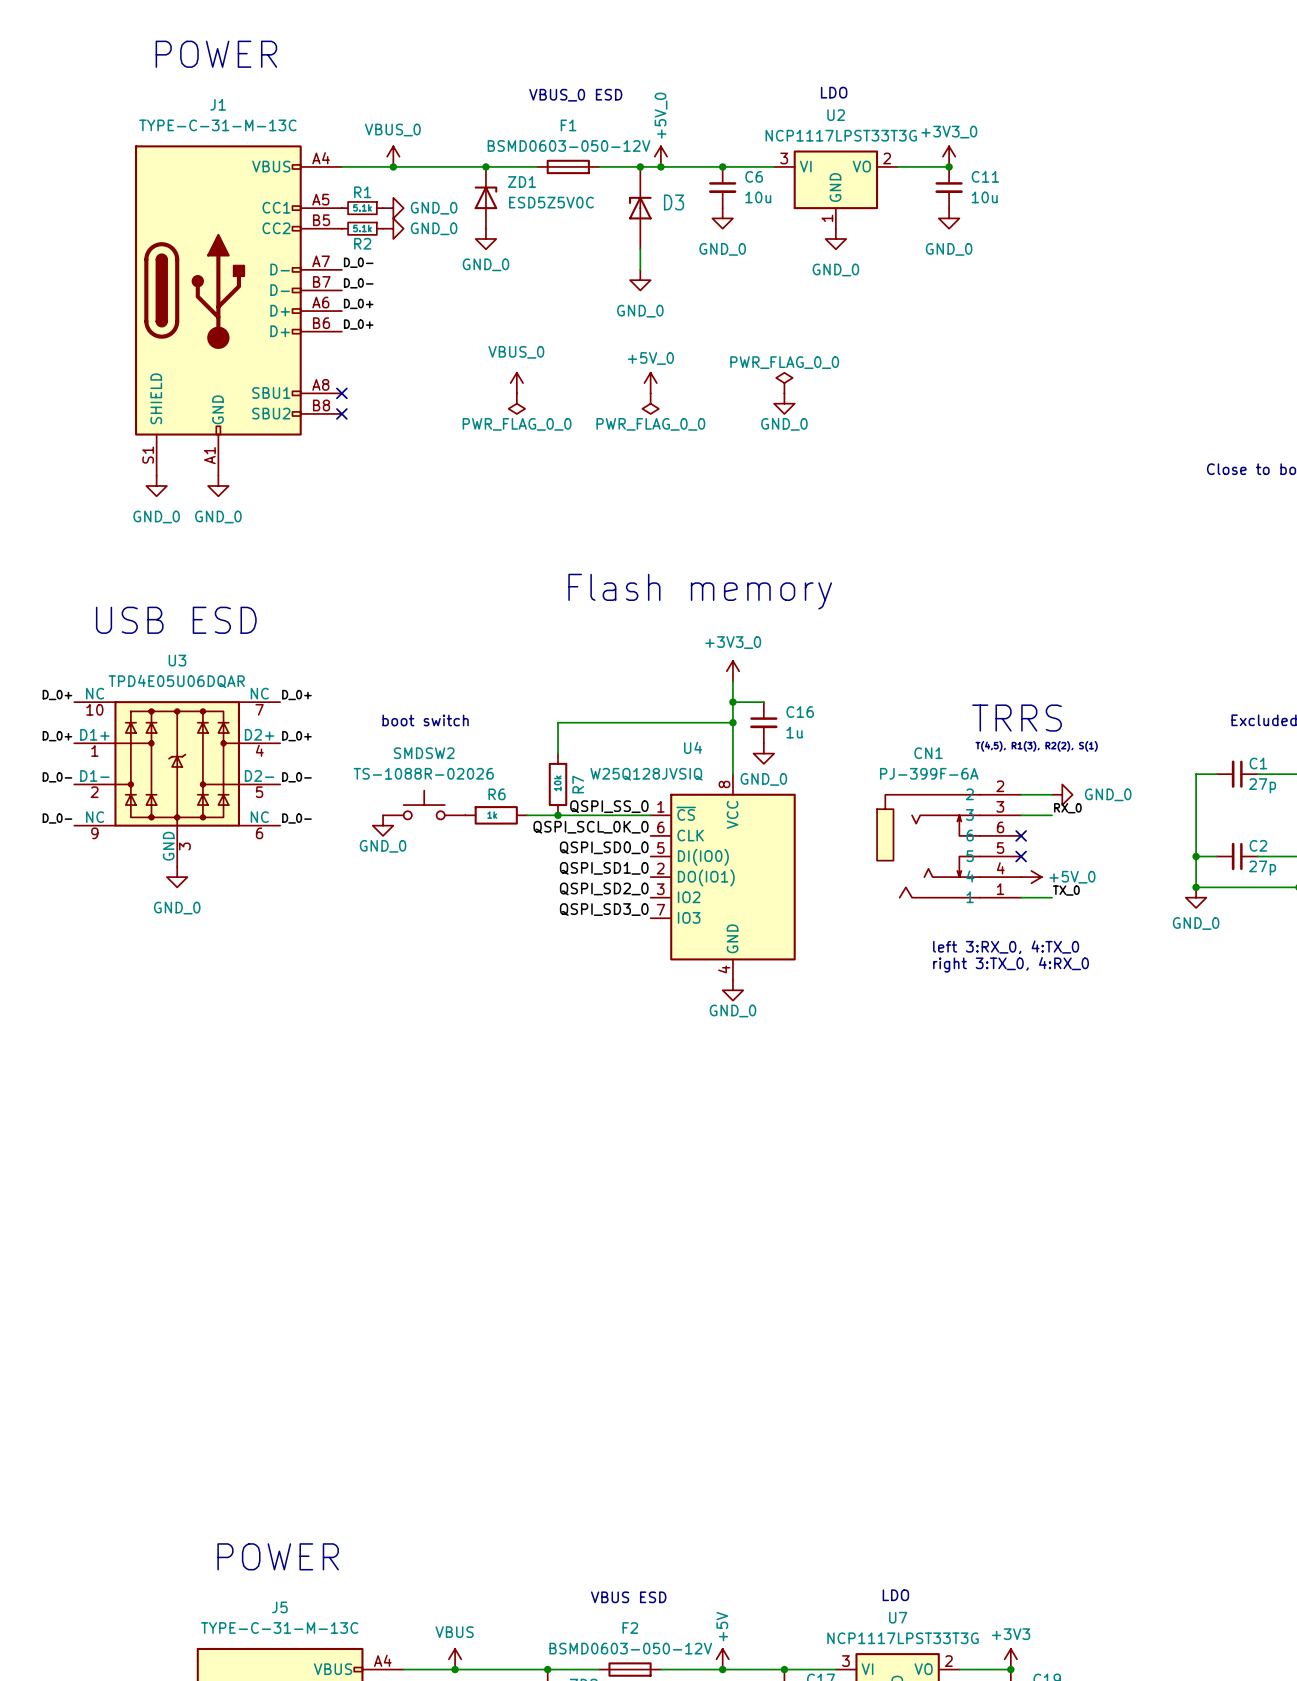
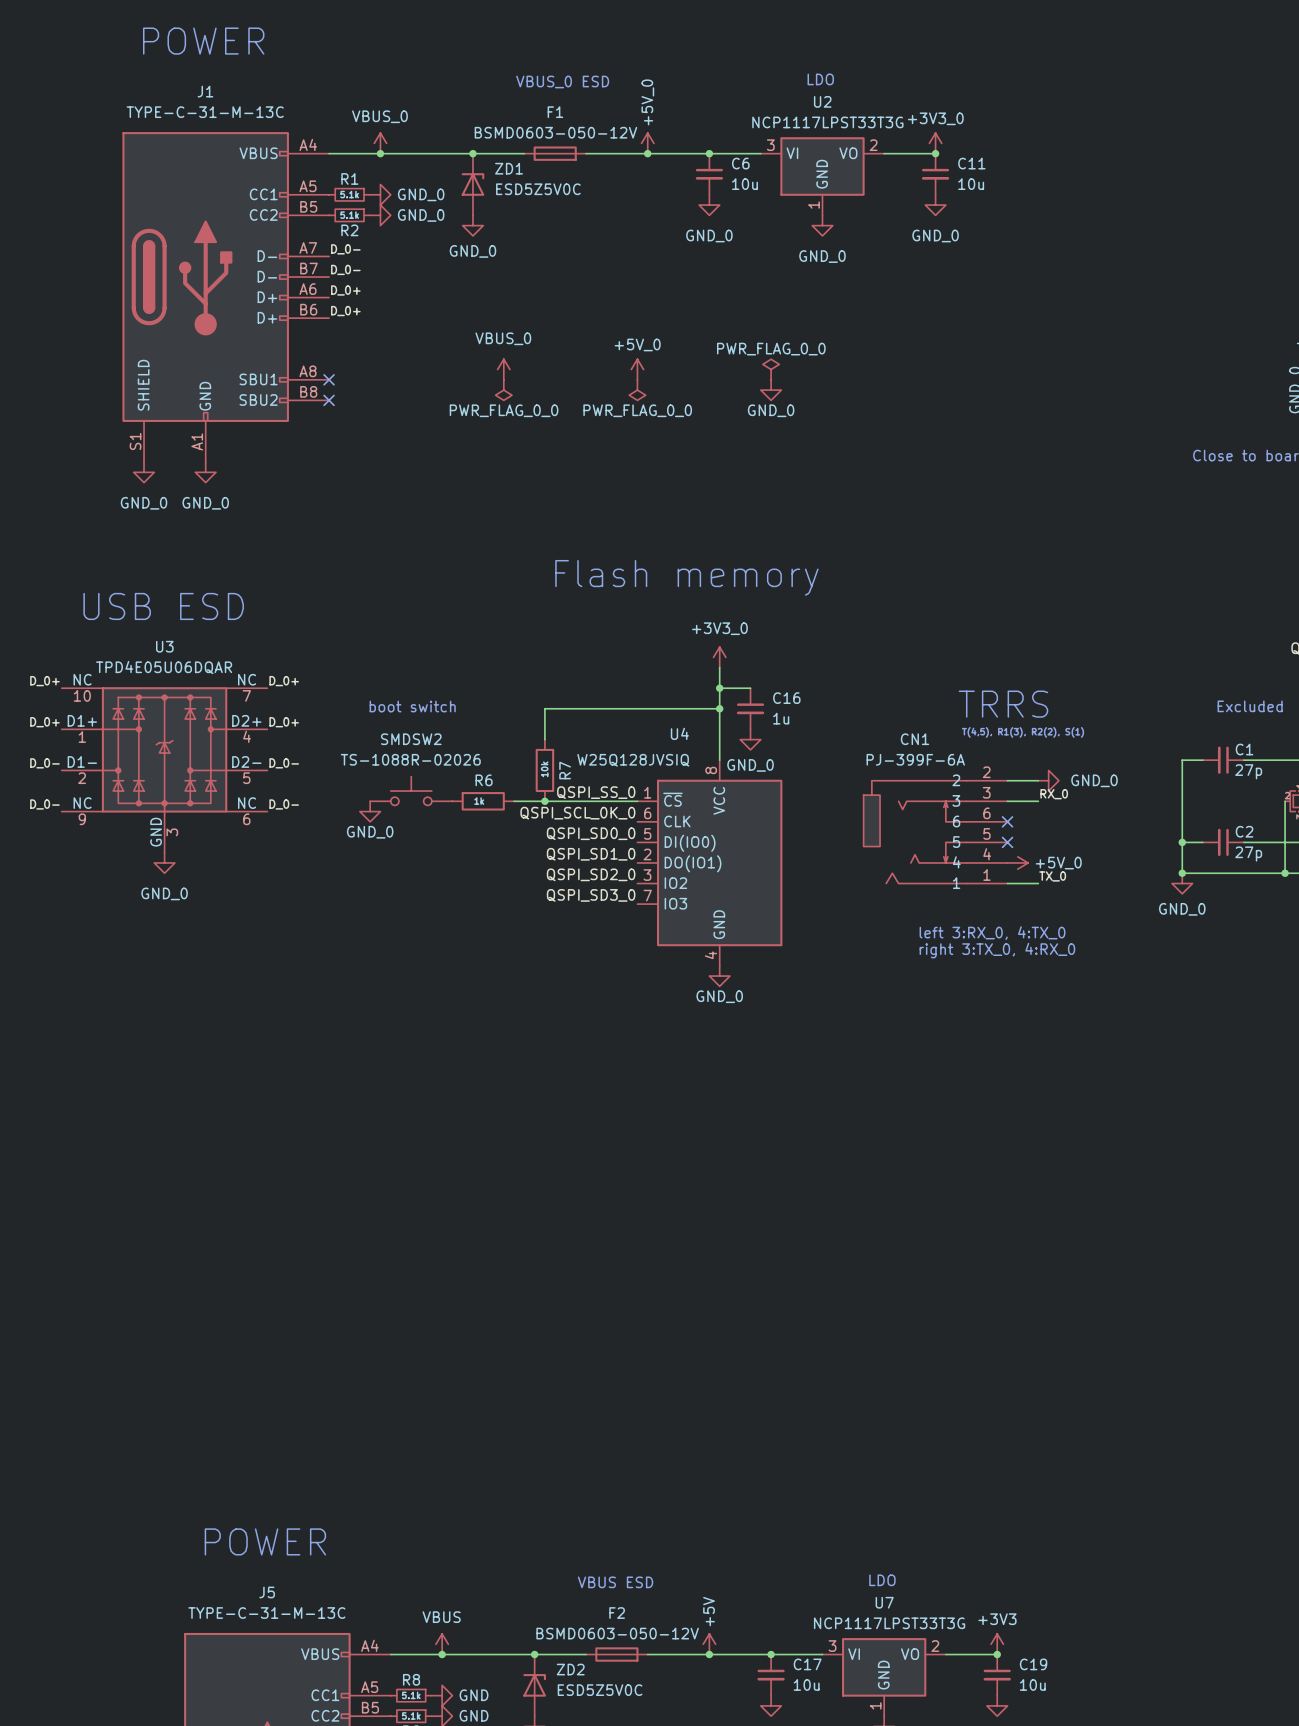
junction: (640, 166) -> none
D3: (640, 208) -> none
wire: (640, 249) (640, 269) -> none
power symbol: GND_0 (640, 280) -> none

